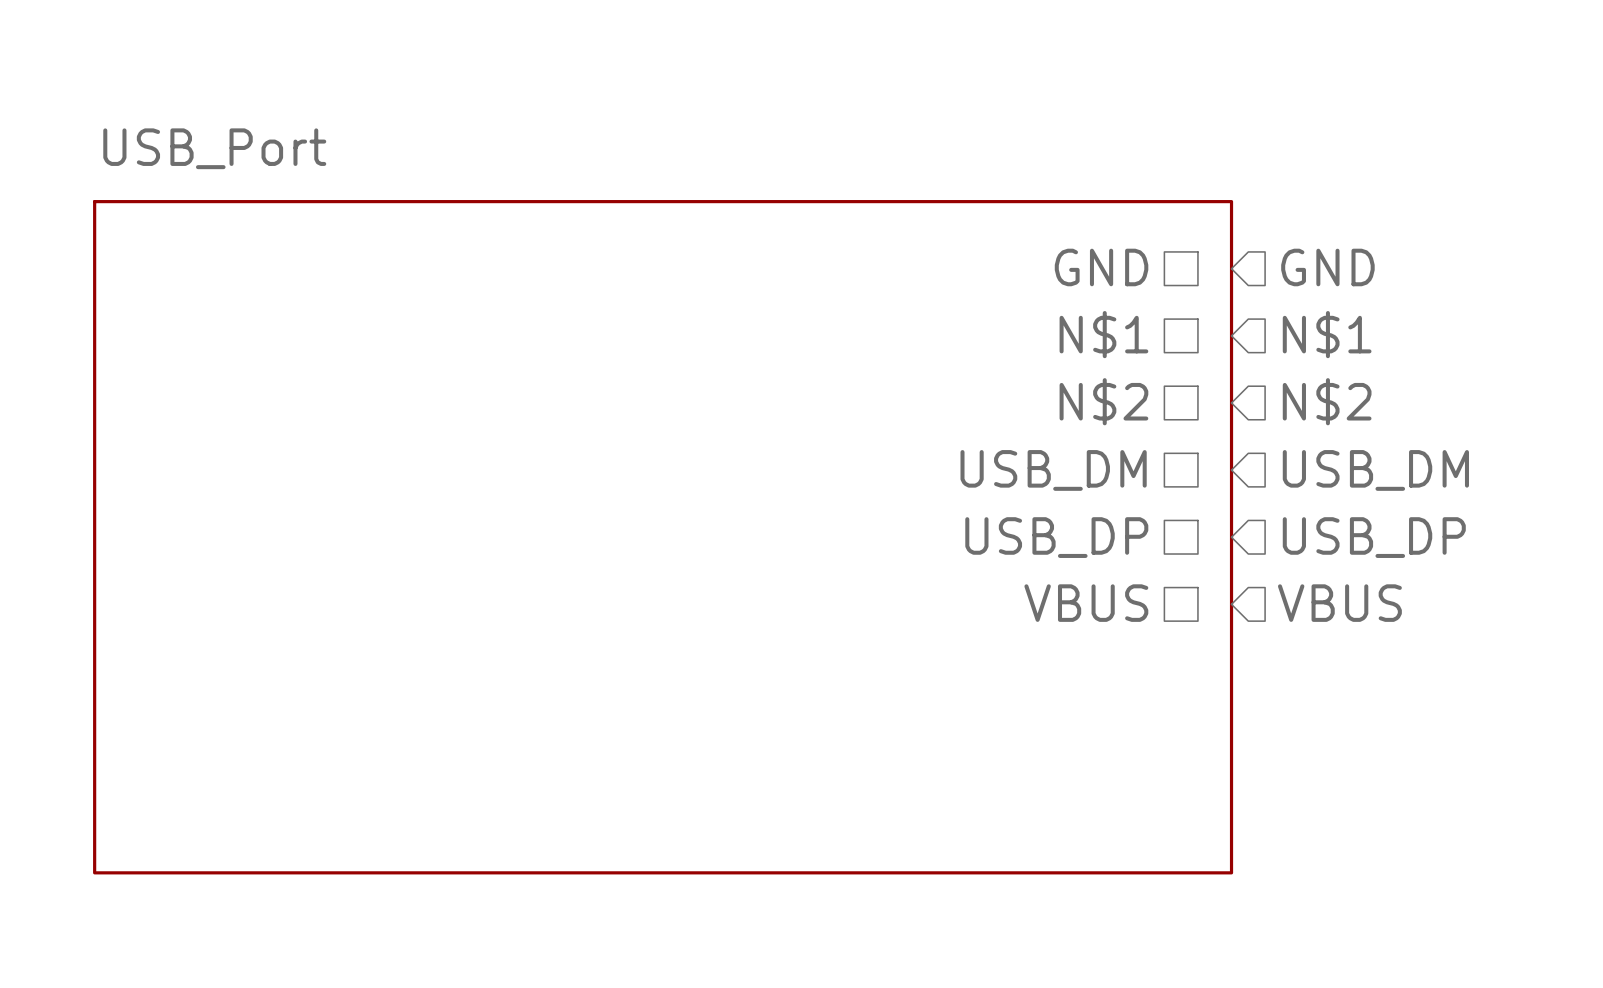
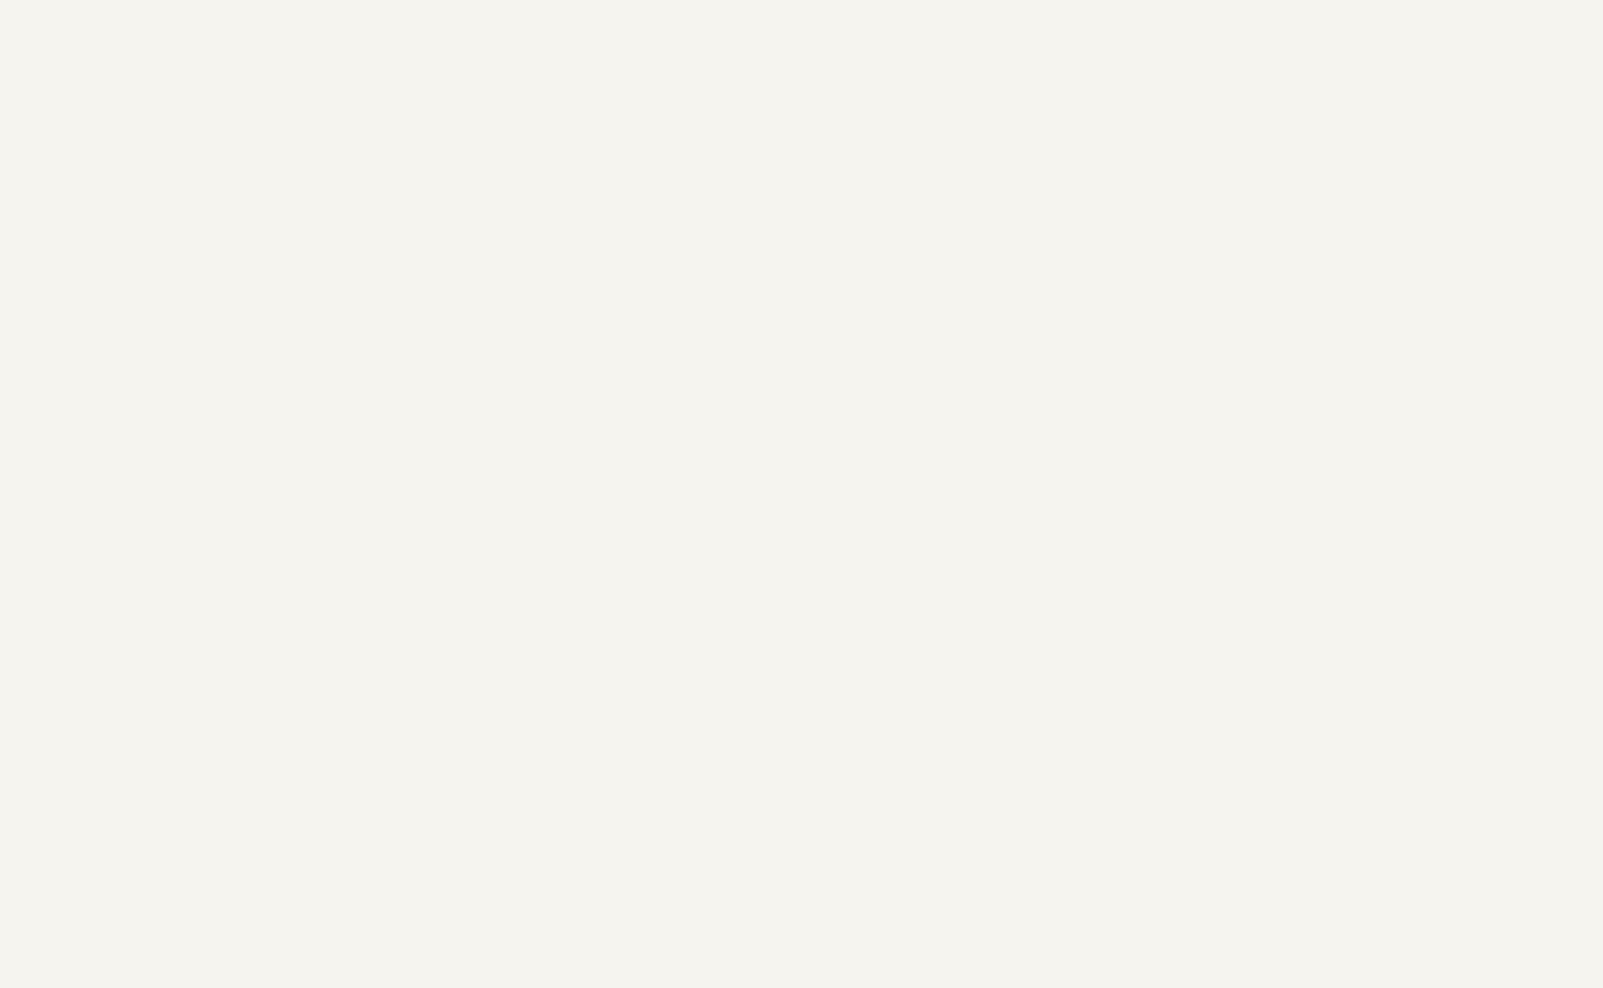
sheet pin: GND (1101, 267) -> none
hierarchical label: GND (1327, 267) -> none
sheet pin: N$1 (1103, 334) -> none
hierarchical label: N$1 (1327, 334) -> none
sheet pin: N$2 (1103, 401) -> none
hierarchical label: N$2 (1327, 401) -> none
sheet pin: USB_DM (1053, 470) -> none
hierarchical label: USB_DM (1375, 470) -> none
sheet USB_Port: (663, 537) -> none
sheet pin: USB_DP (1056, 537) -> none
hierarchical label: USB_DP (1374, 537) -> none
sheet pin: VBUS (1086, 603) -> none
hierarchical label: VBUS (1339, 603) -> none

